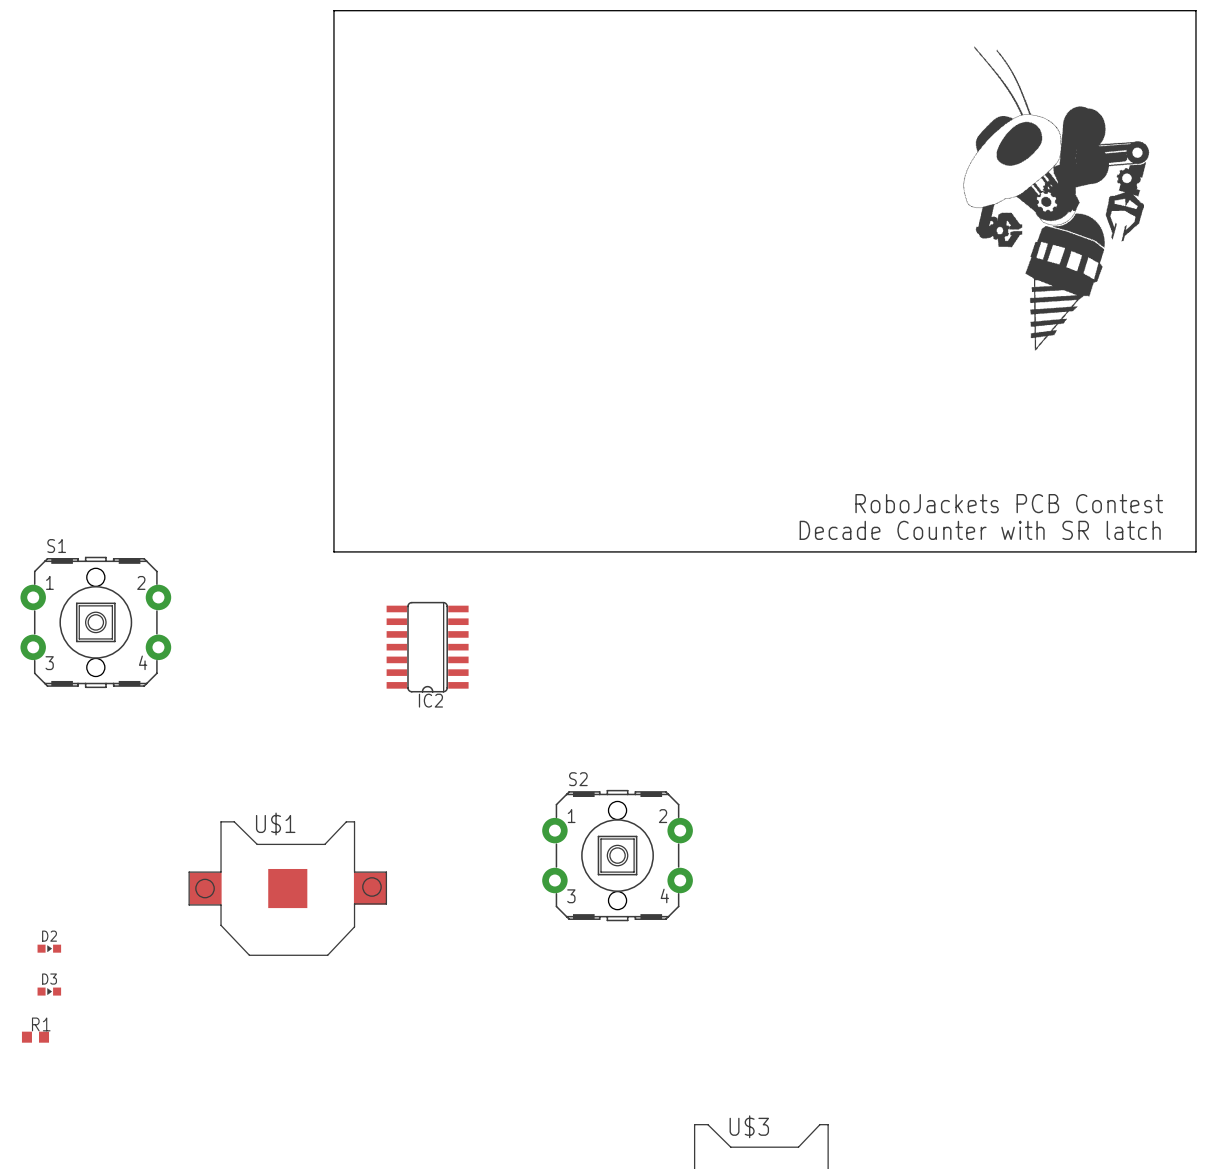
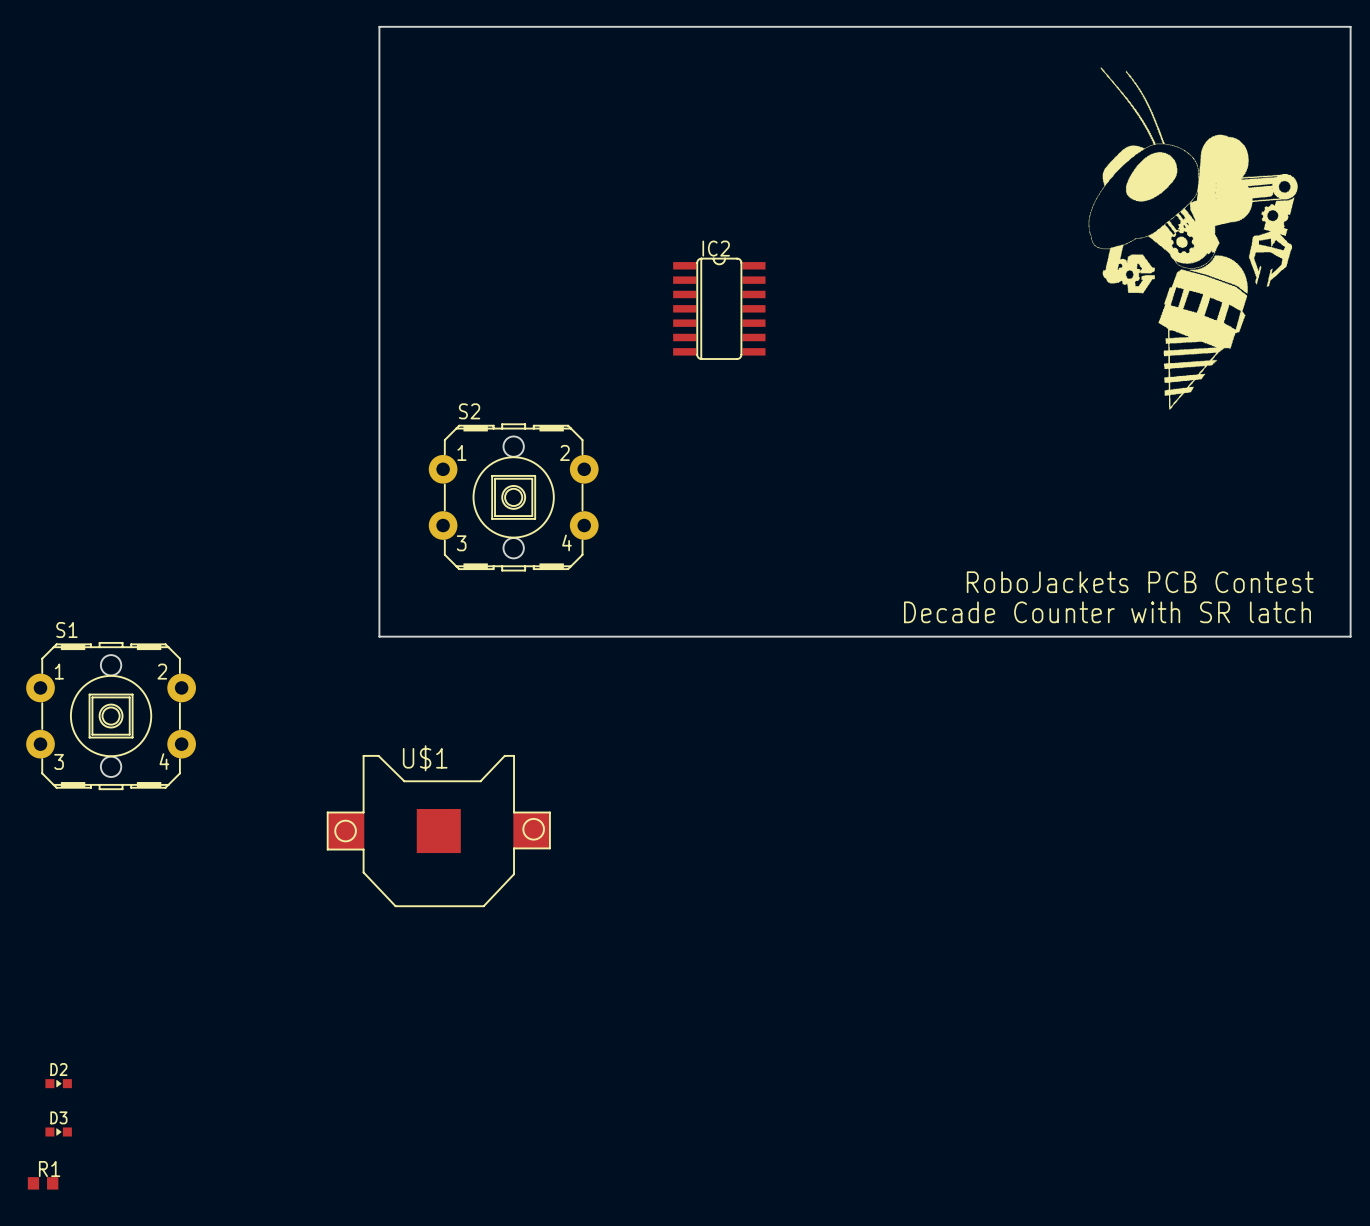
IC2 rotation: 0° (427, 647) -> 180° (719, 308)
IC2 position: (427, 647) -> (719, 308)
S2 position: (617, 855) -> (513, 497)
U$1 position: (287, 888) -> (438, 831)

